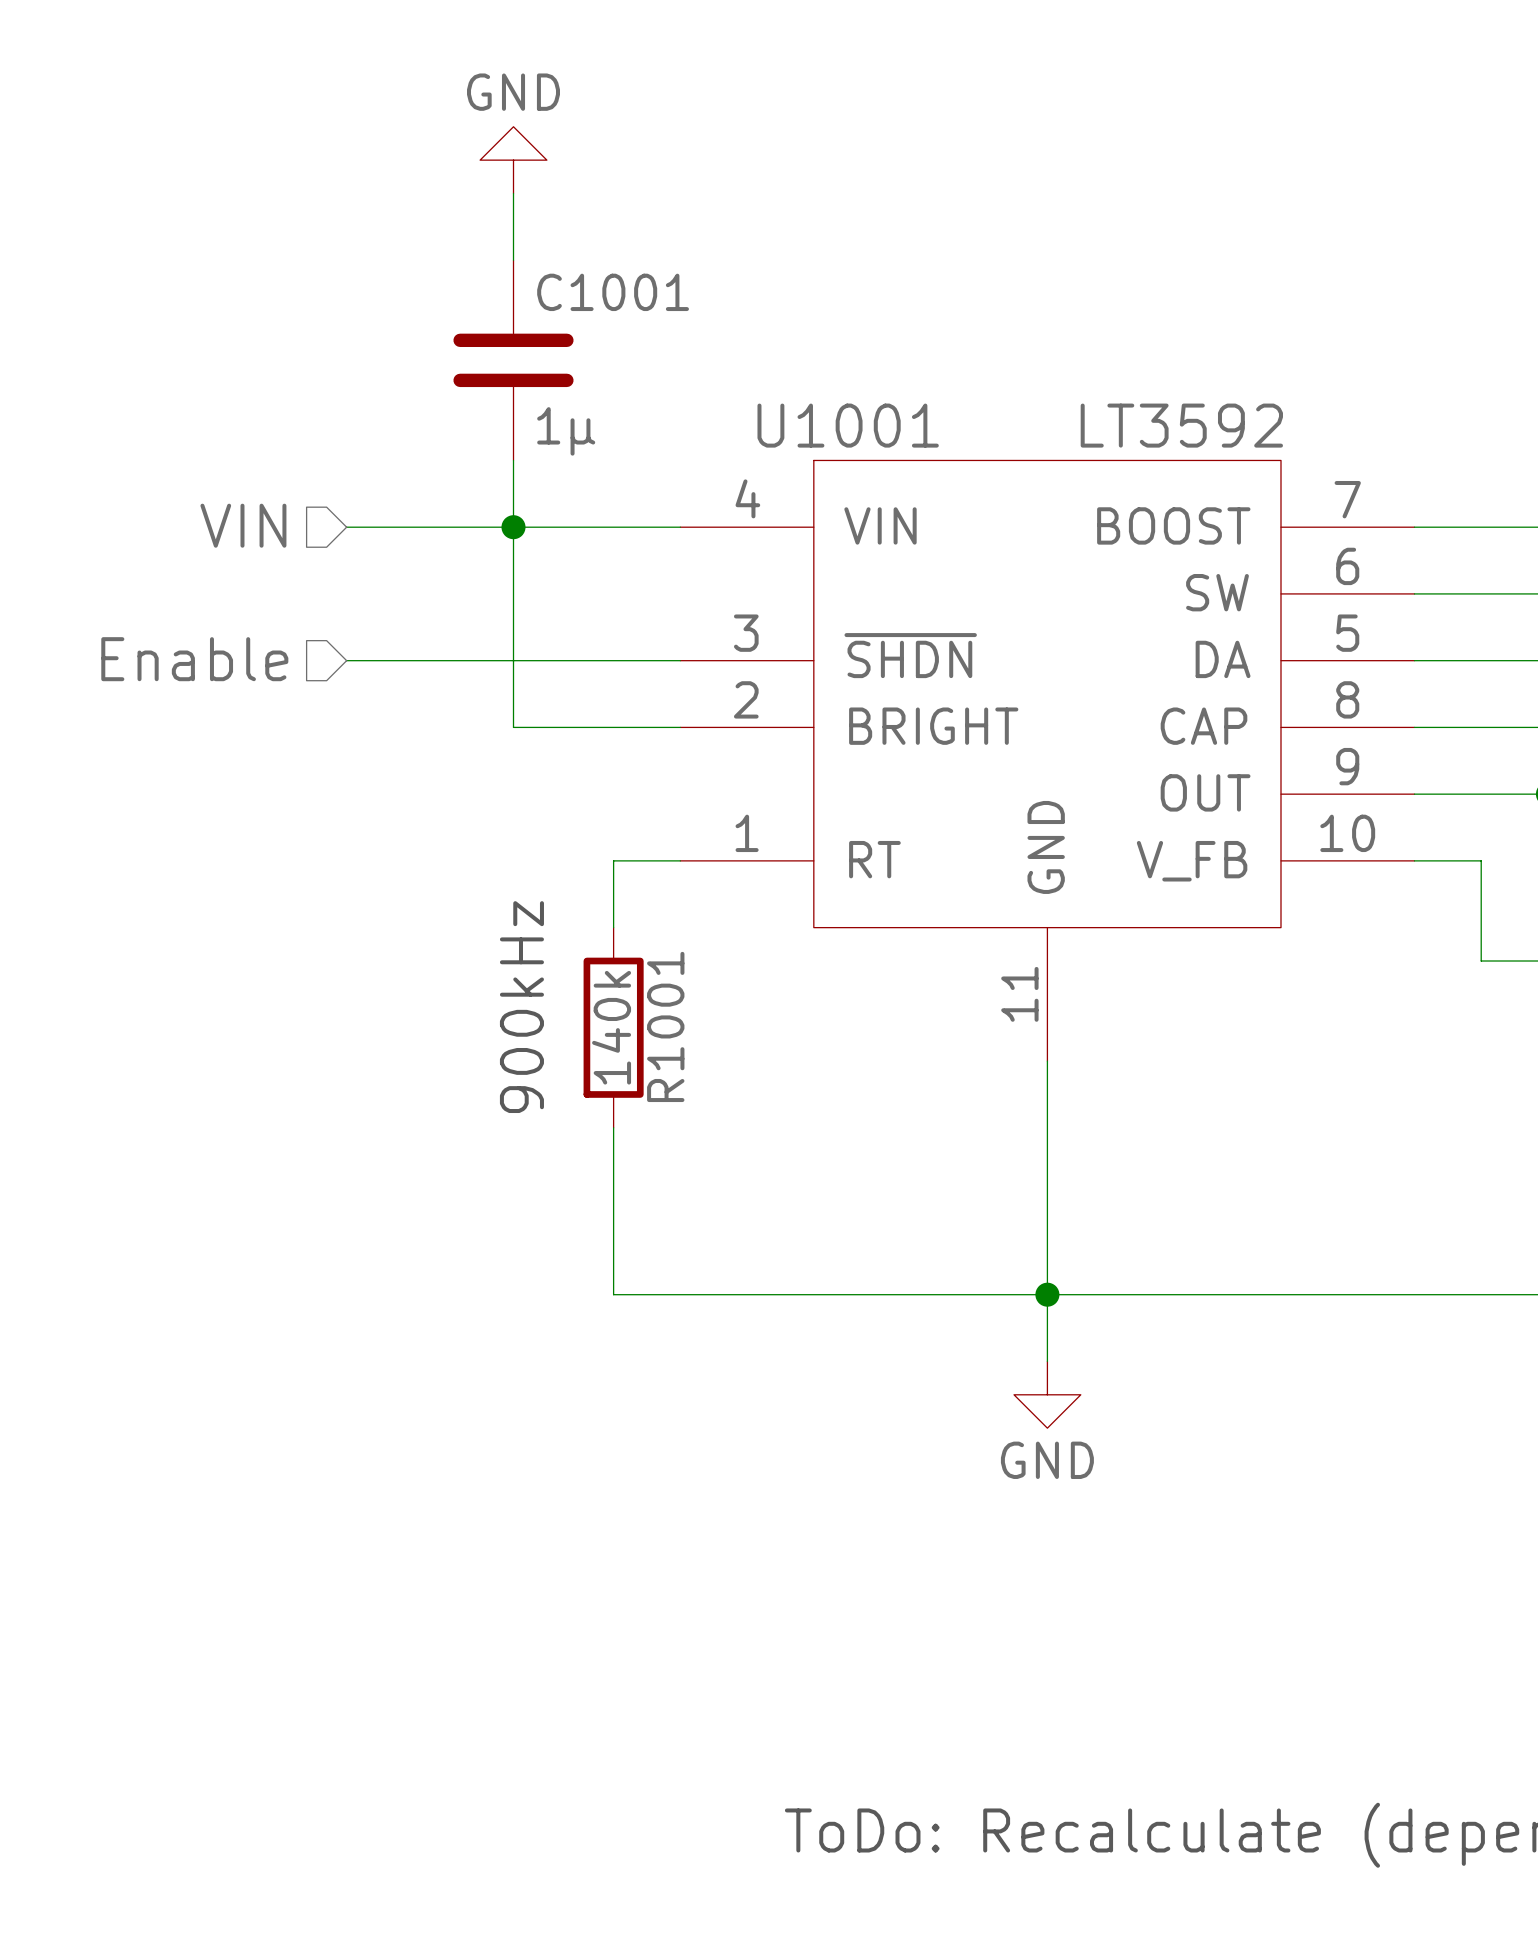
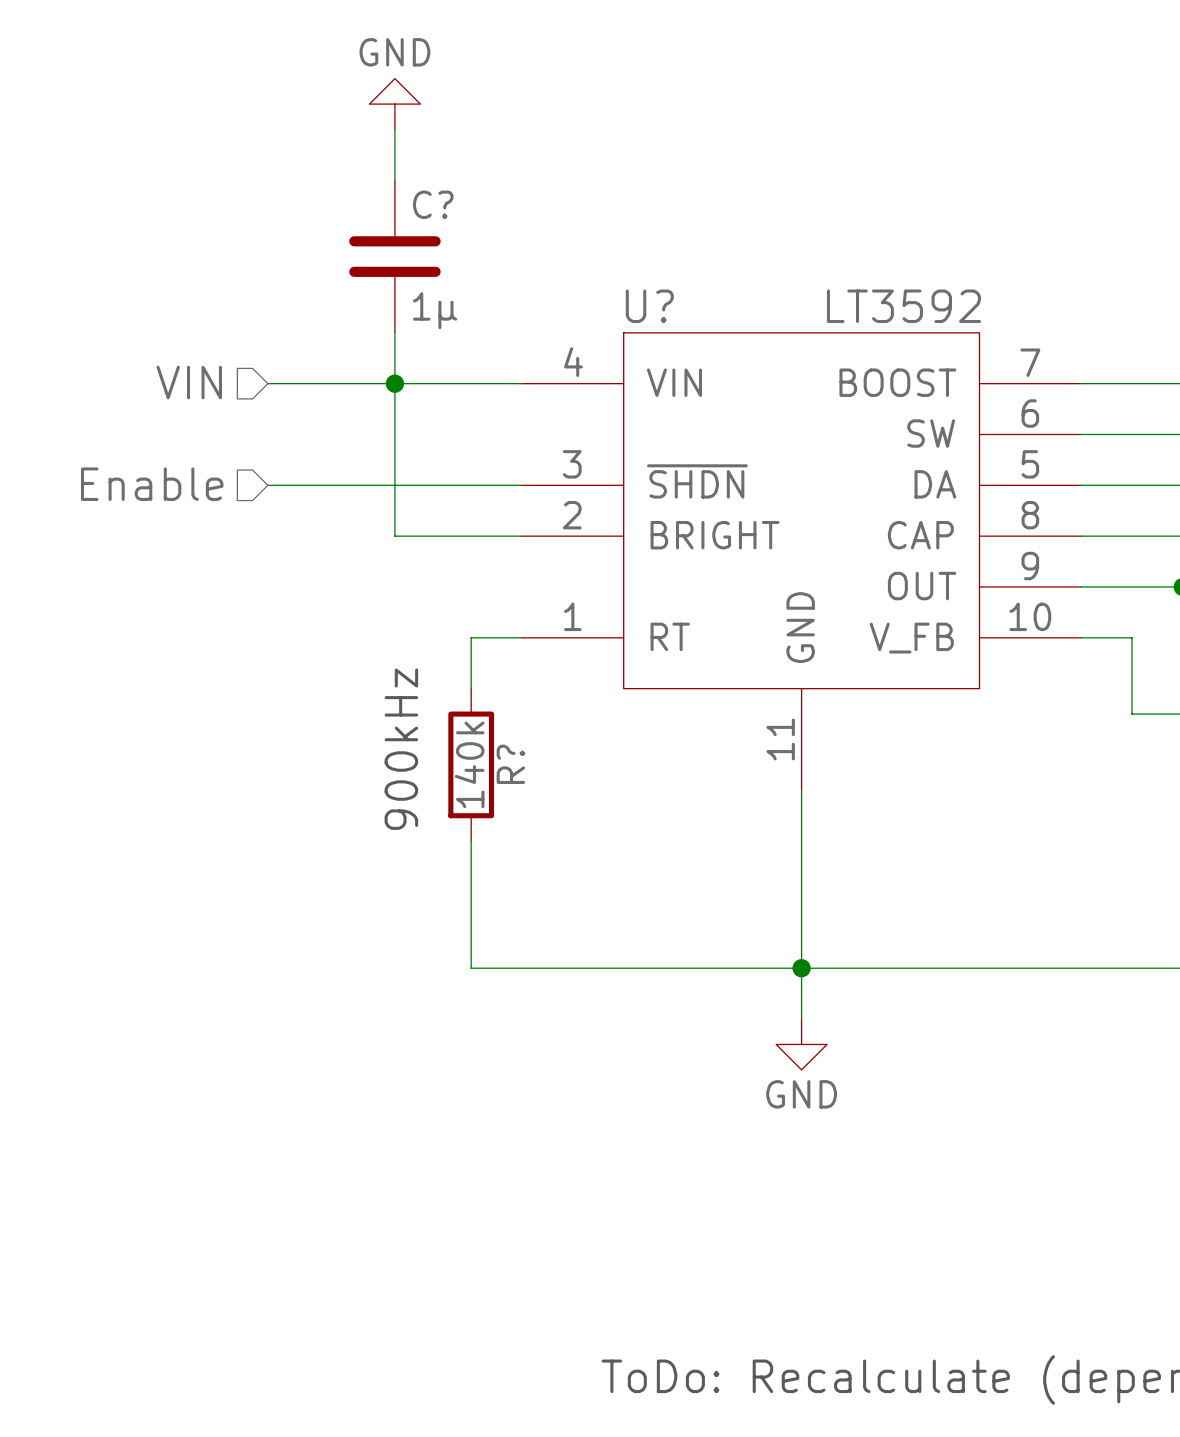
C1001 name: C1001 (613, 292) -> C? (433, 204)
U1001 name: U1001 (848, 425) -> U? (649, 306)
R1001 name: R1001 (665, 1026) -> R? (510, 764)

